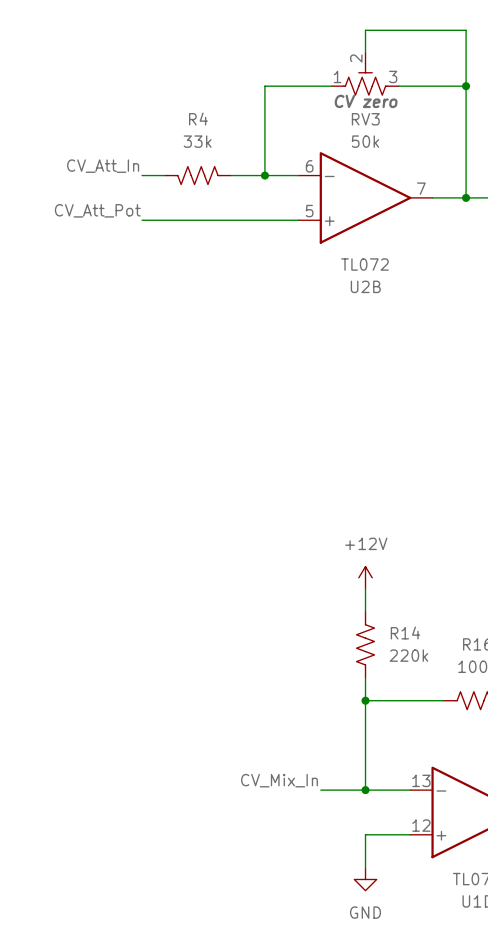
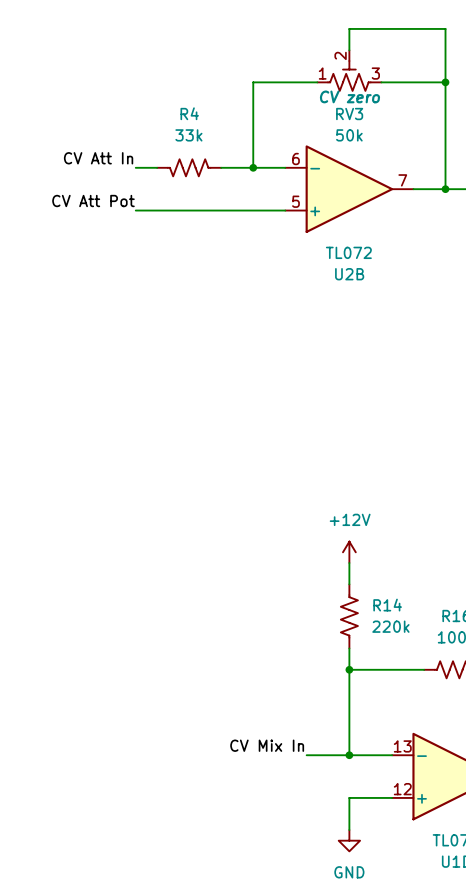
label: CV_Att_In (103, 166) -> CV Att In (98, 158)
label: CV_Att_Pot (97, 210) -> CV Att Pot (93, 201)
label: CV_Mix_In (279, 780) -> CV Mix In (267, 745)

